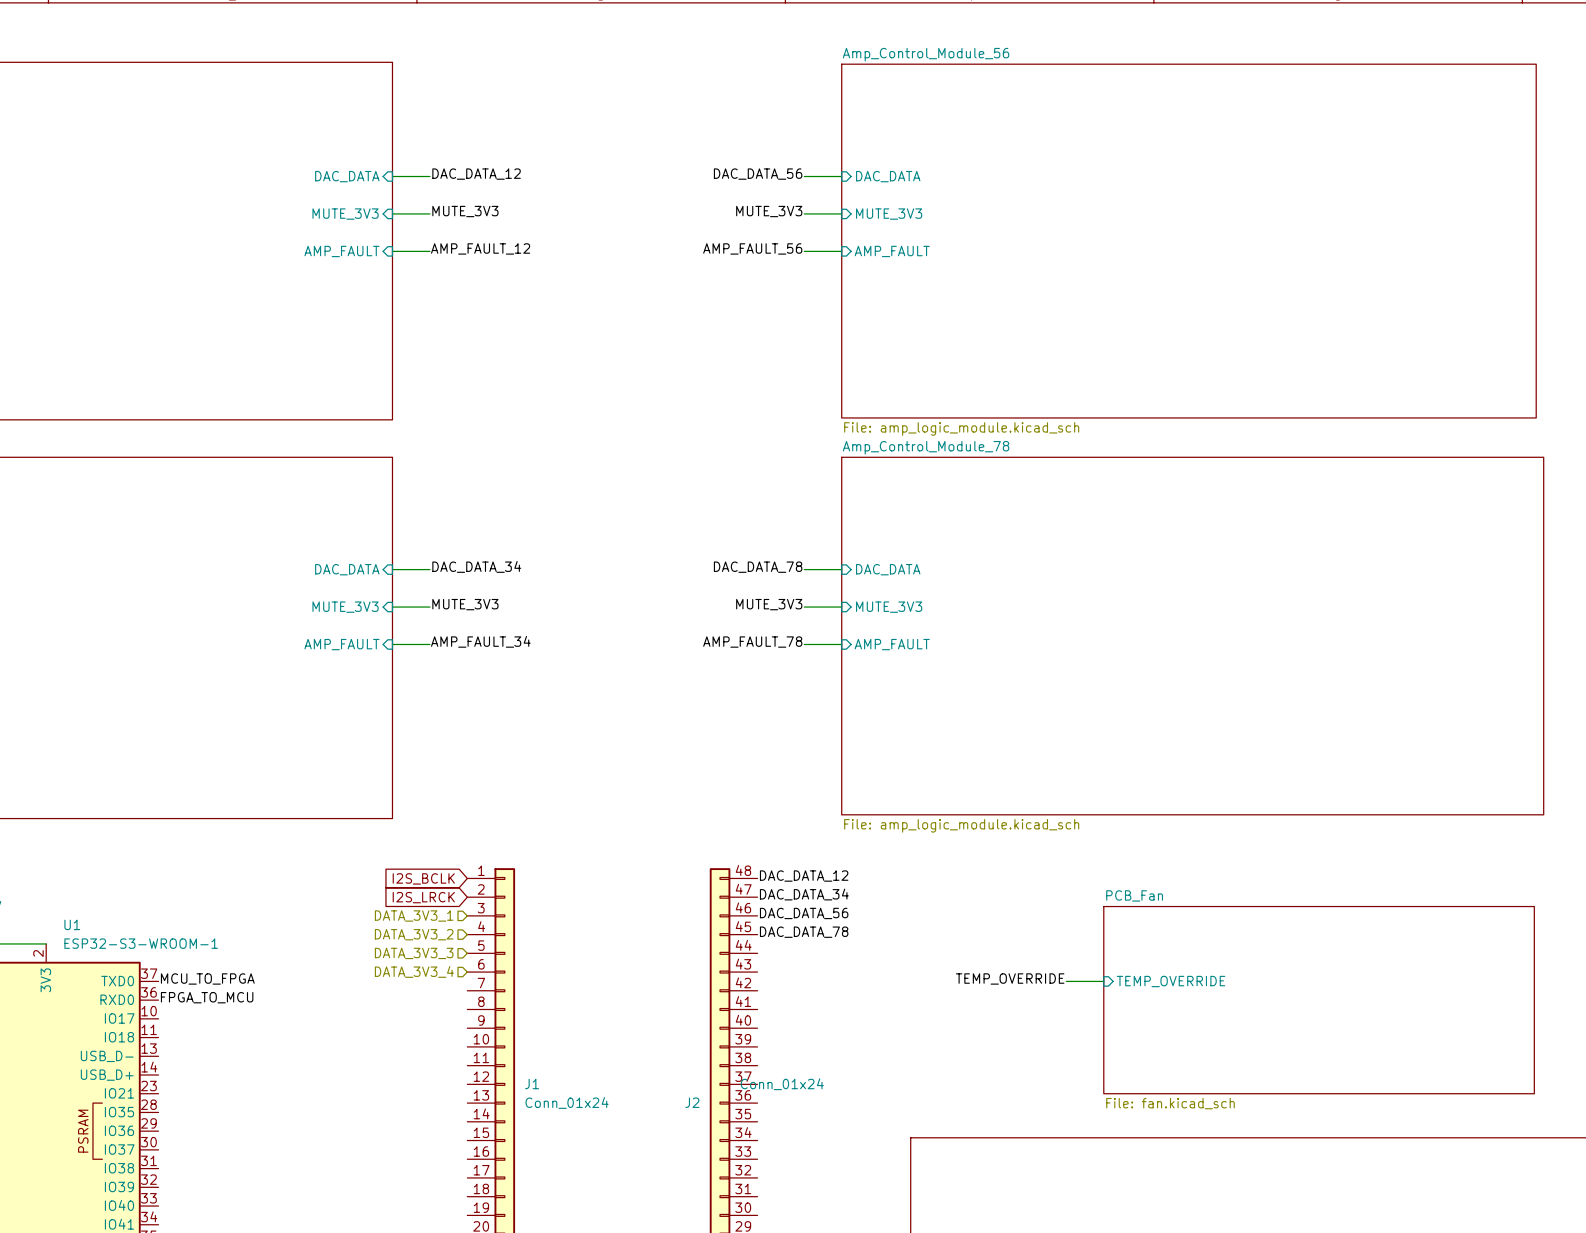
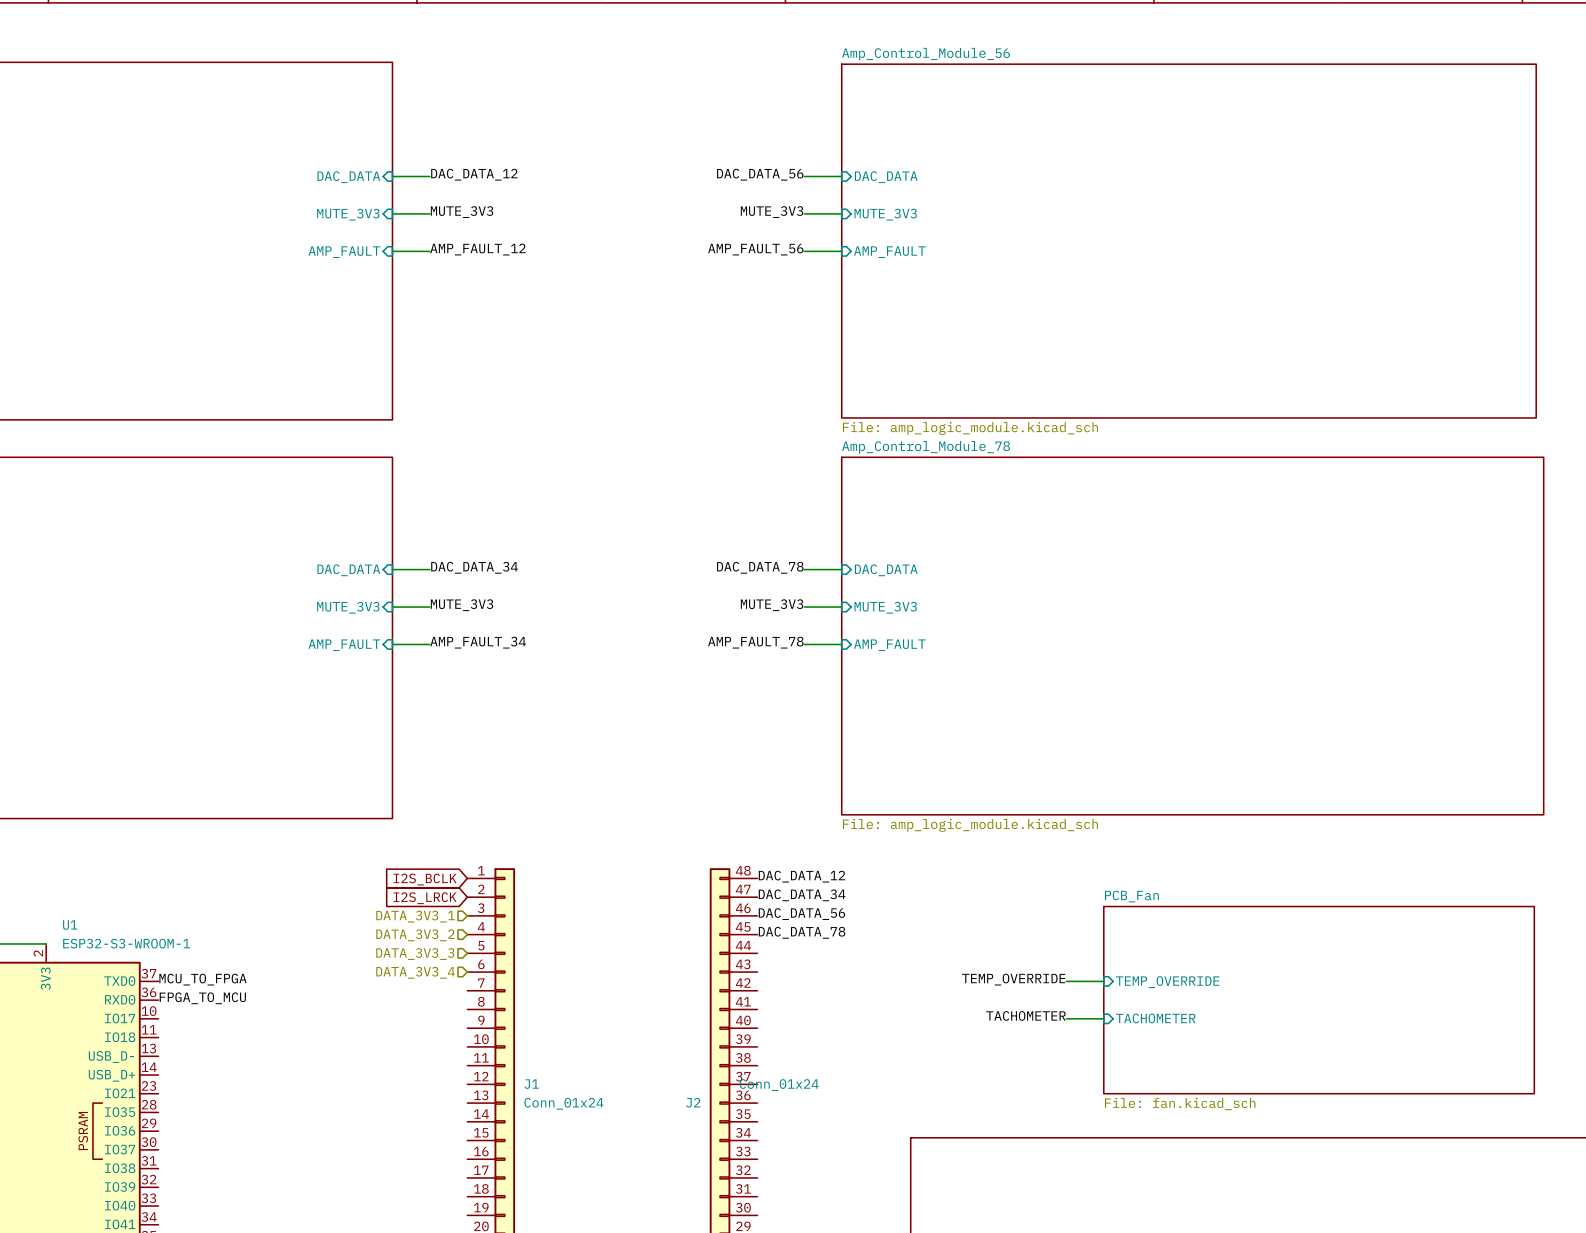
label: none -> TACHOMETER (1025, 1015)
wire: none -> (1066, 1018) (1103, 1018)
sheet pin: none -> TACHOMETER (1155, 1018)

